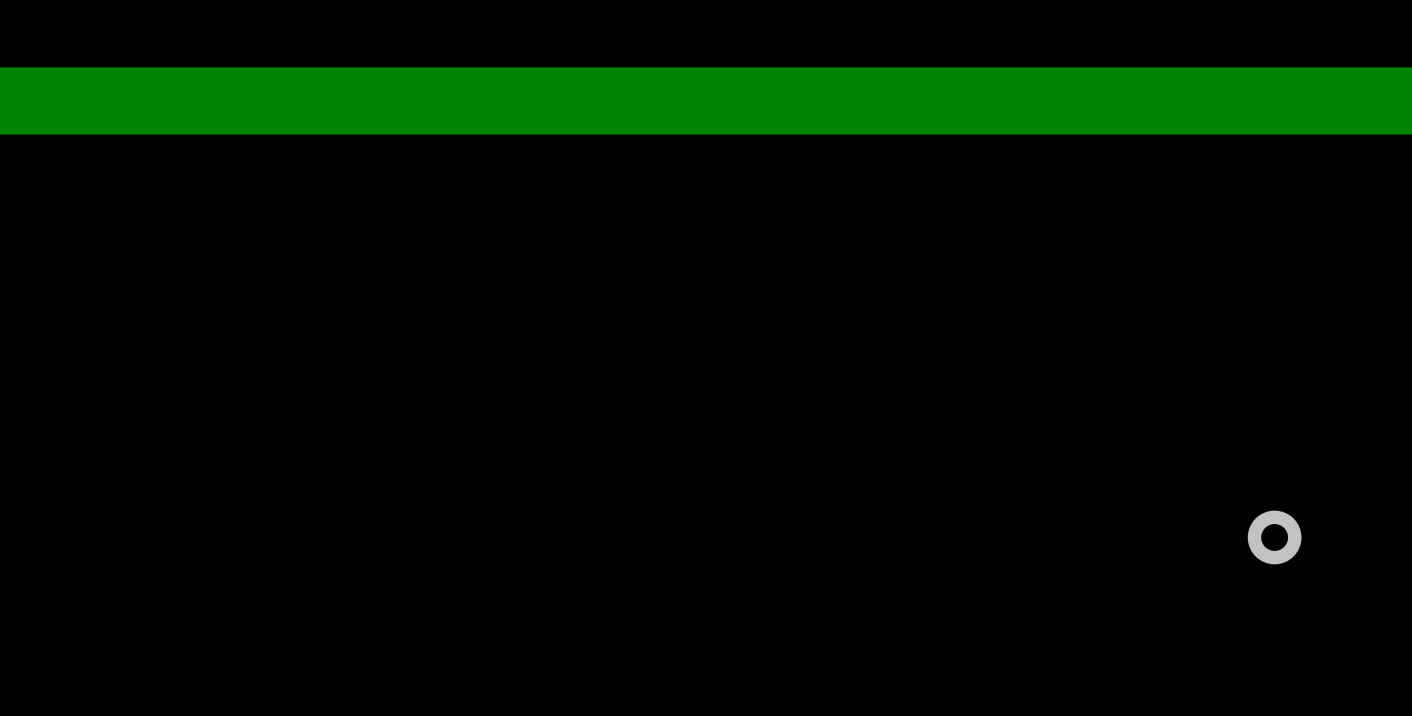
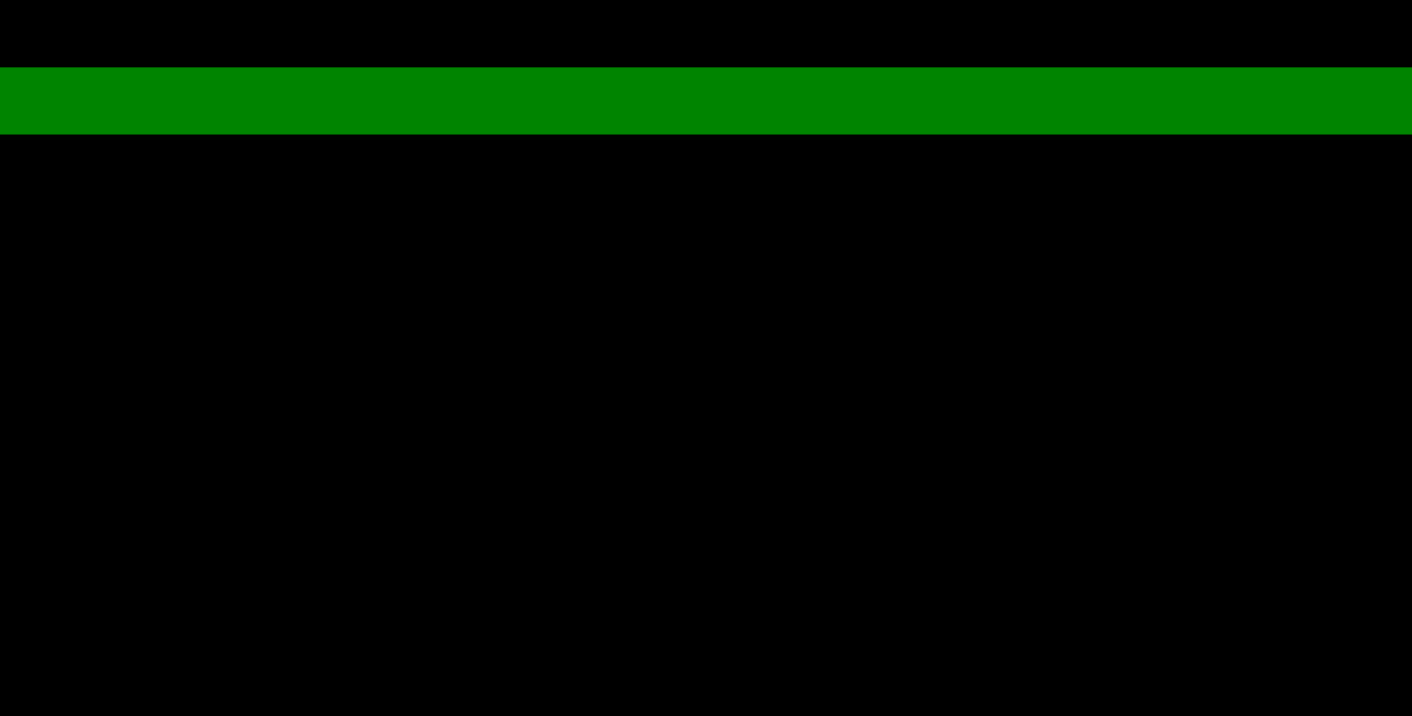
via: (1274, 537) -> none

